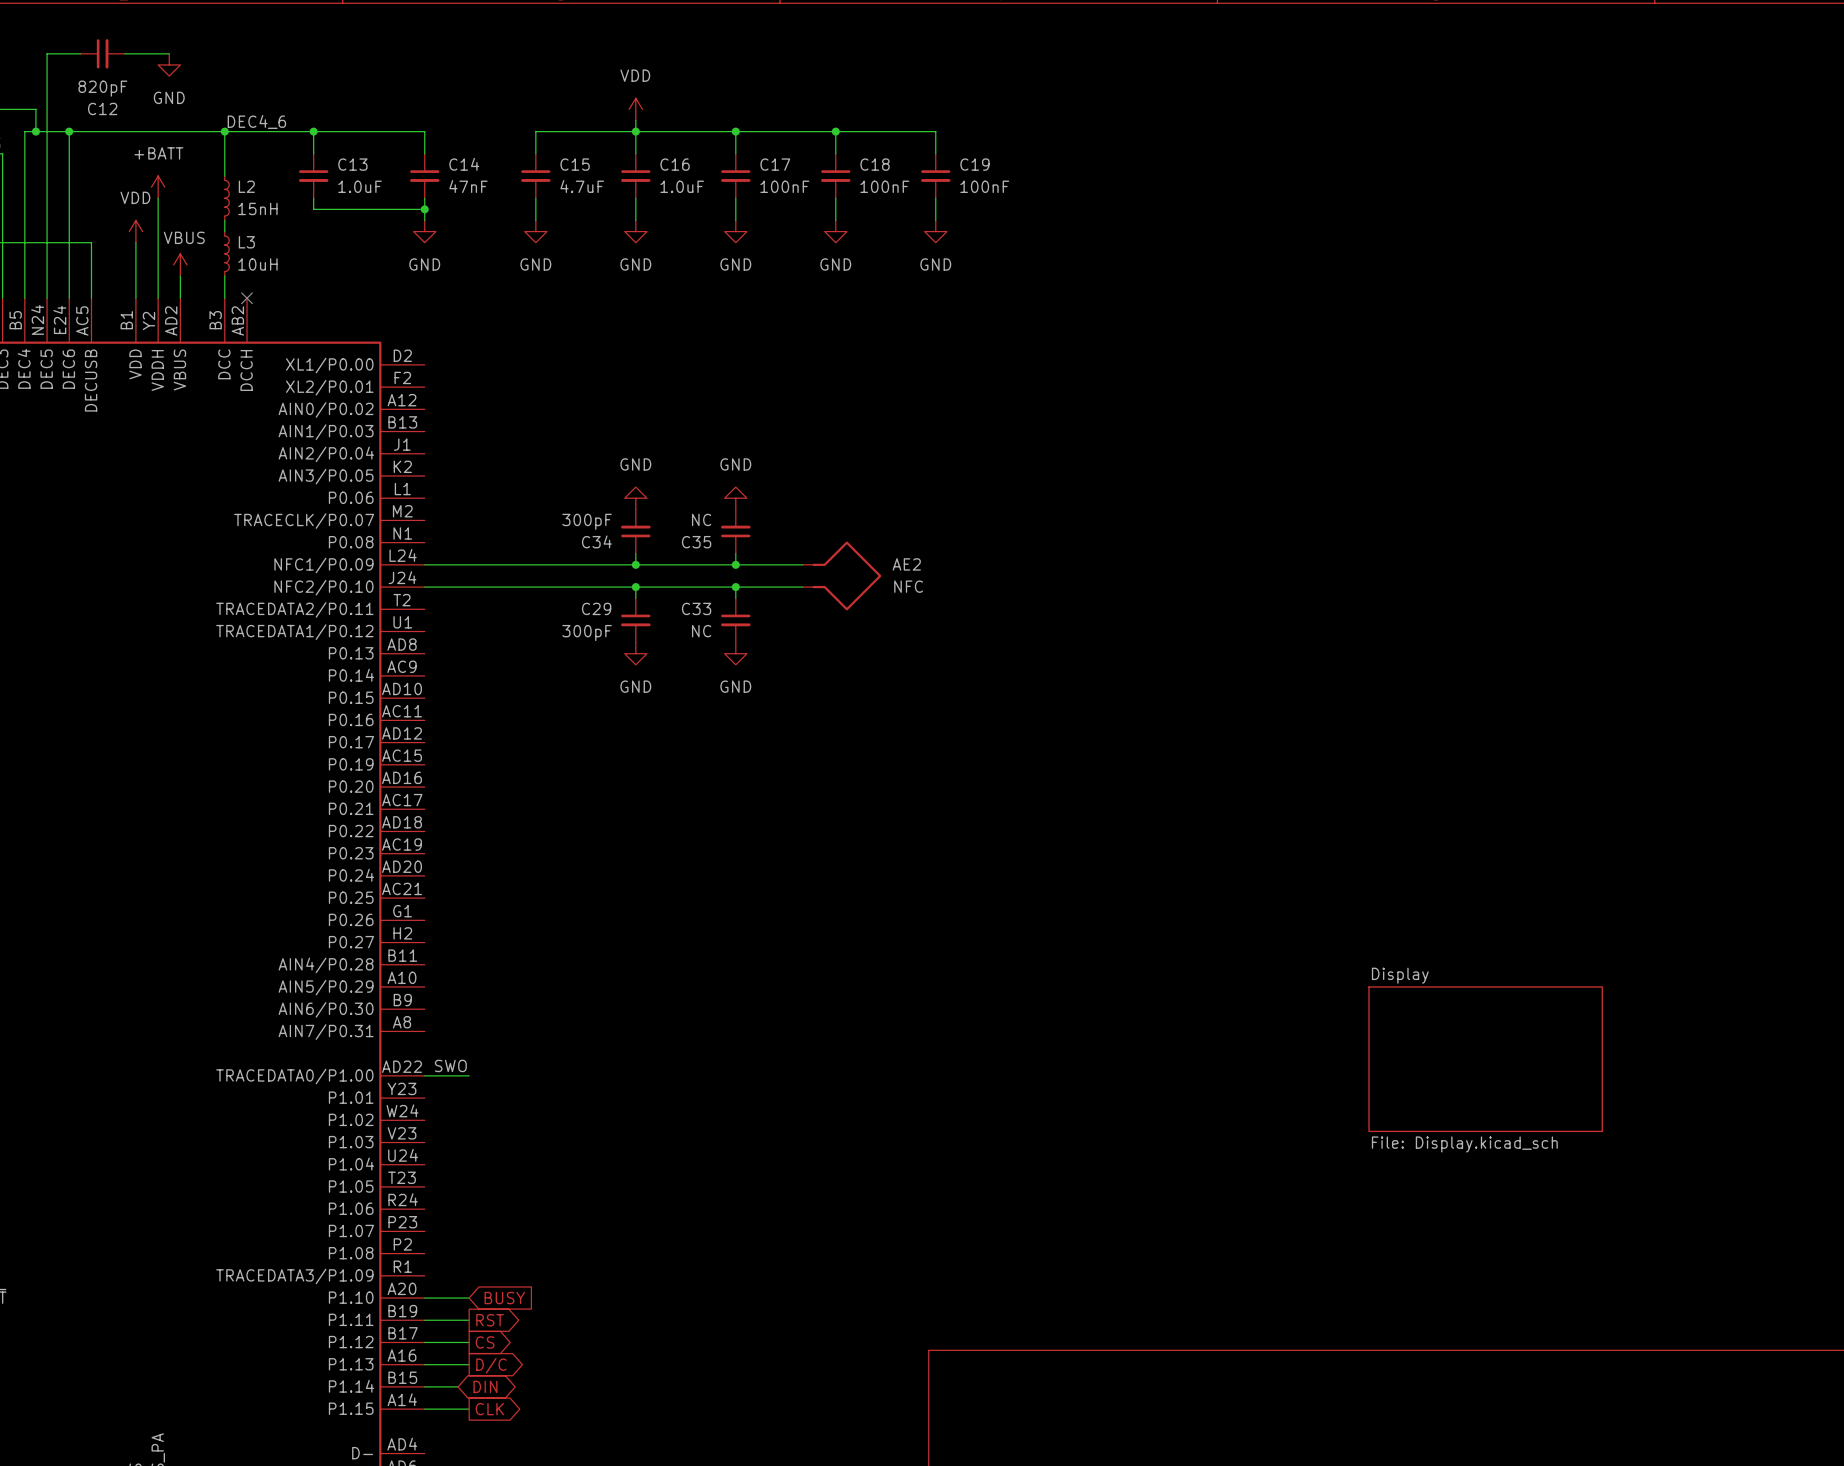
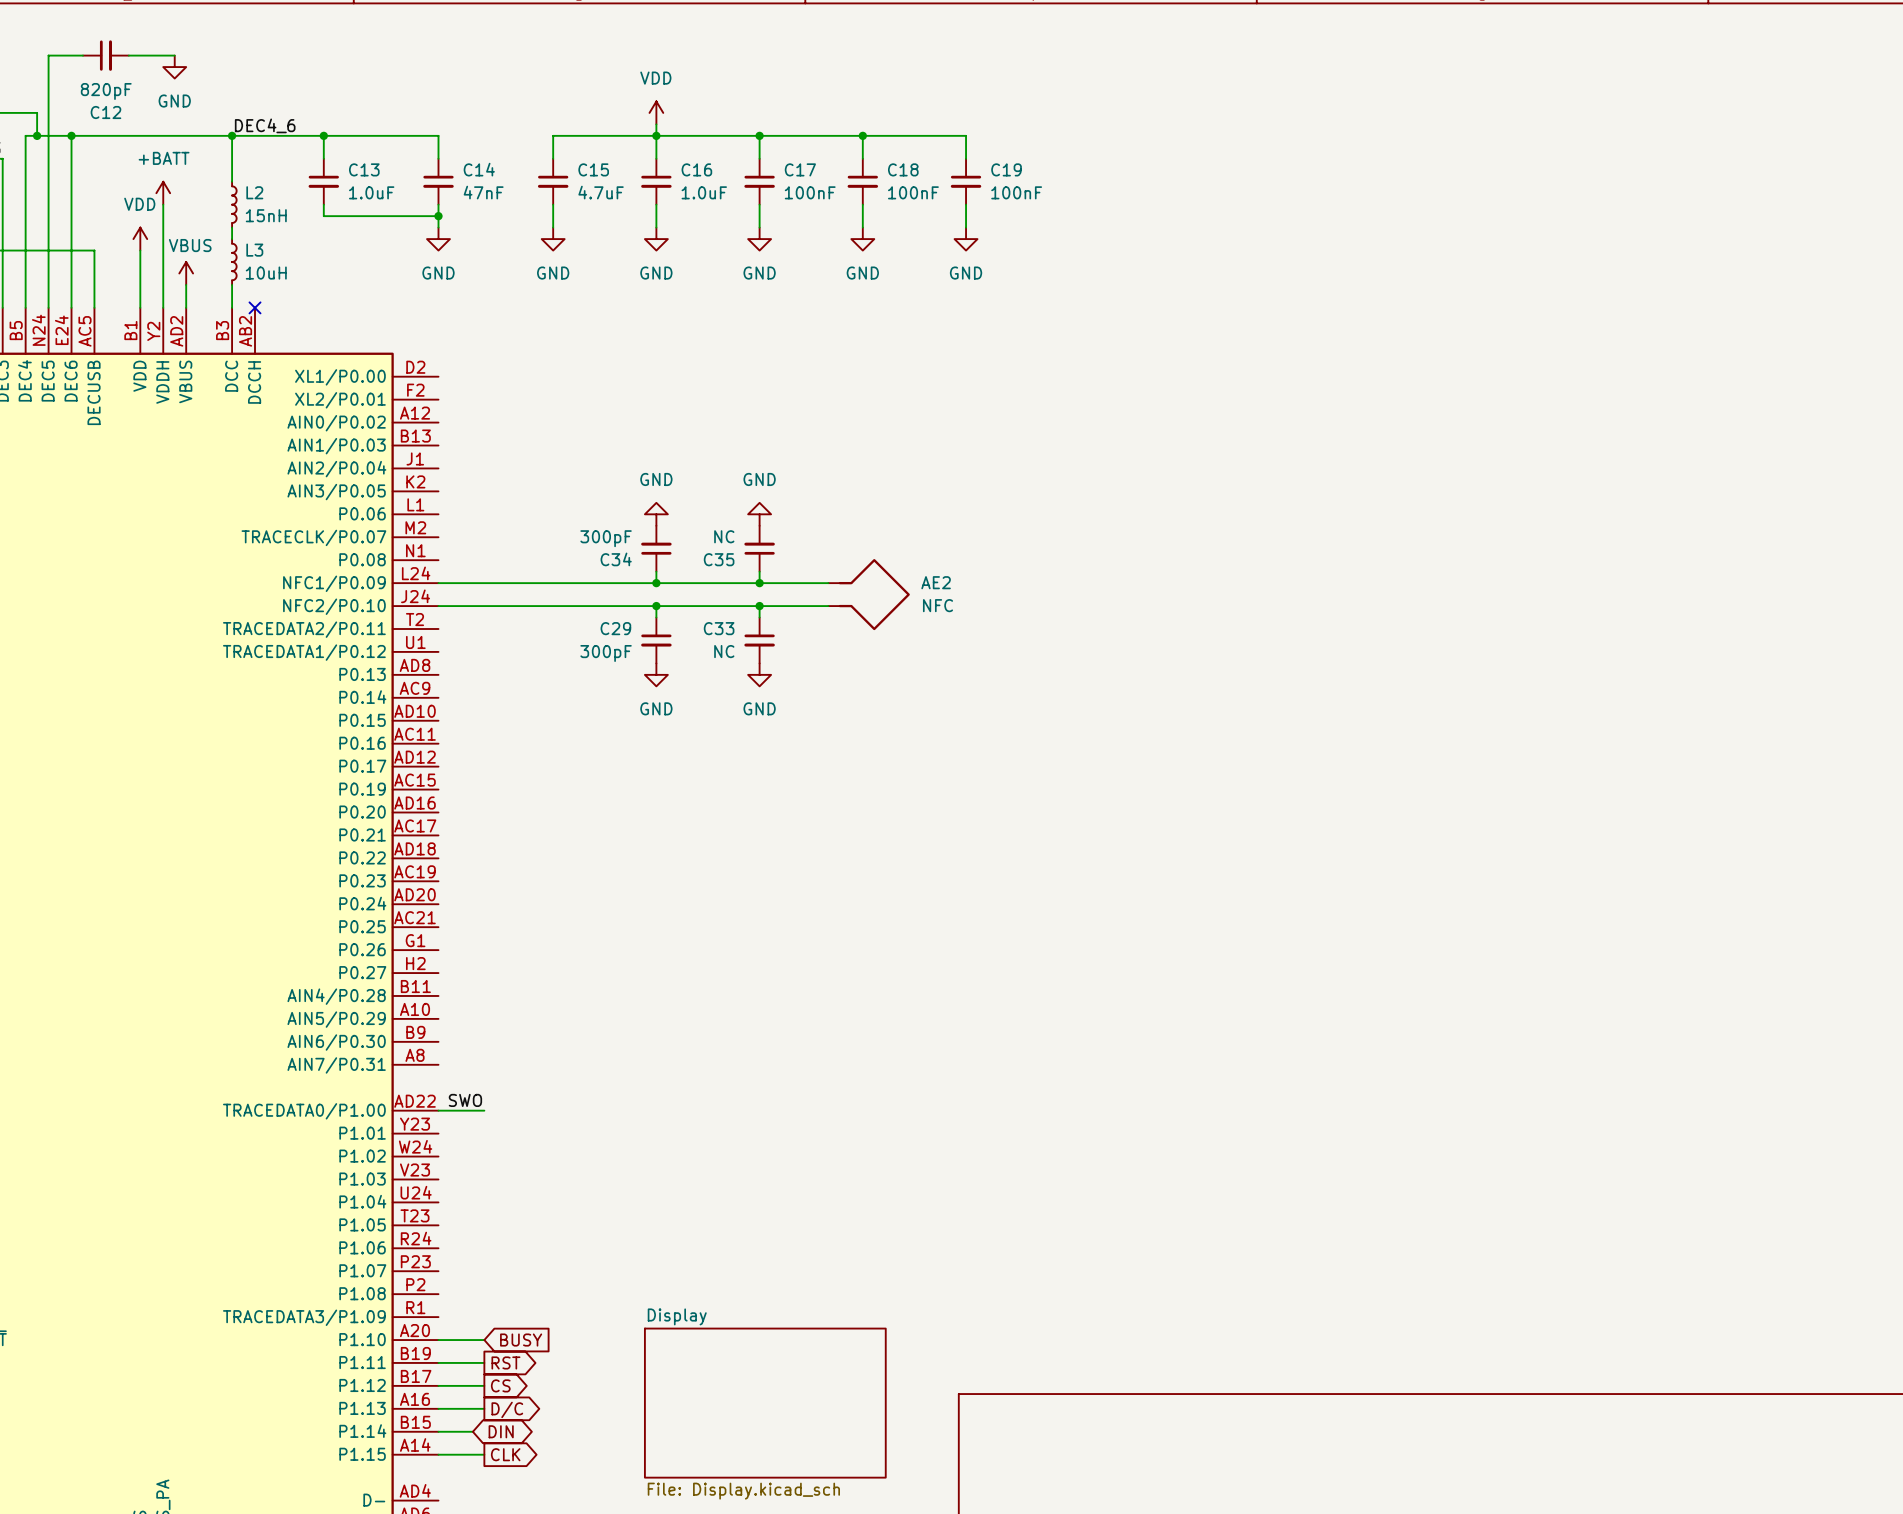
sheet Display: File: Display.kicad_sch (1485, 1059) -> none
sheet Display: none -> File: Display.kicad_sch (765, 1403)

